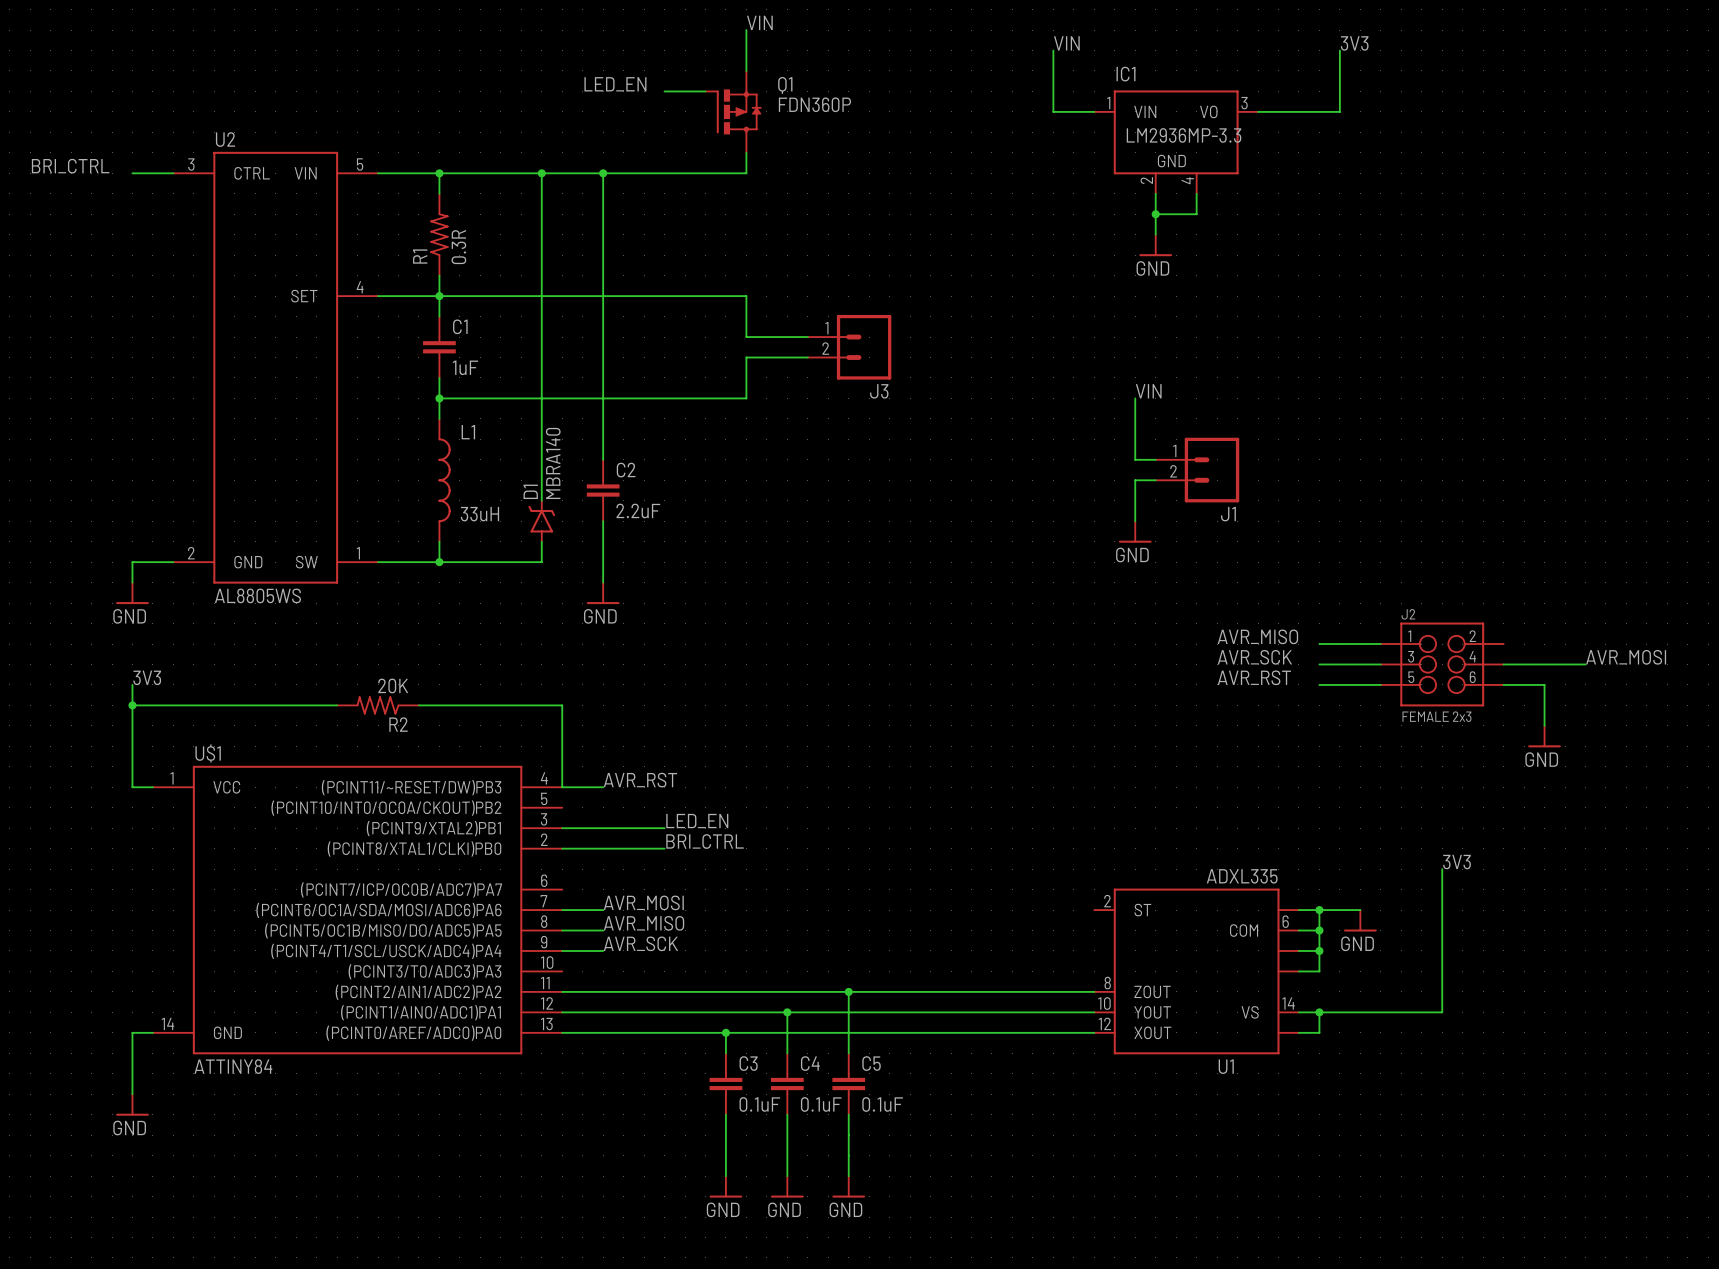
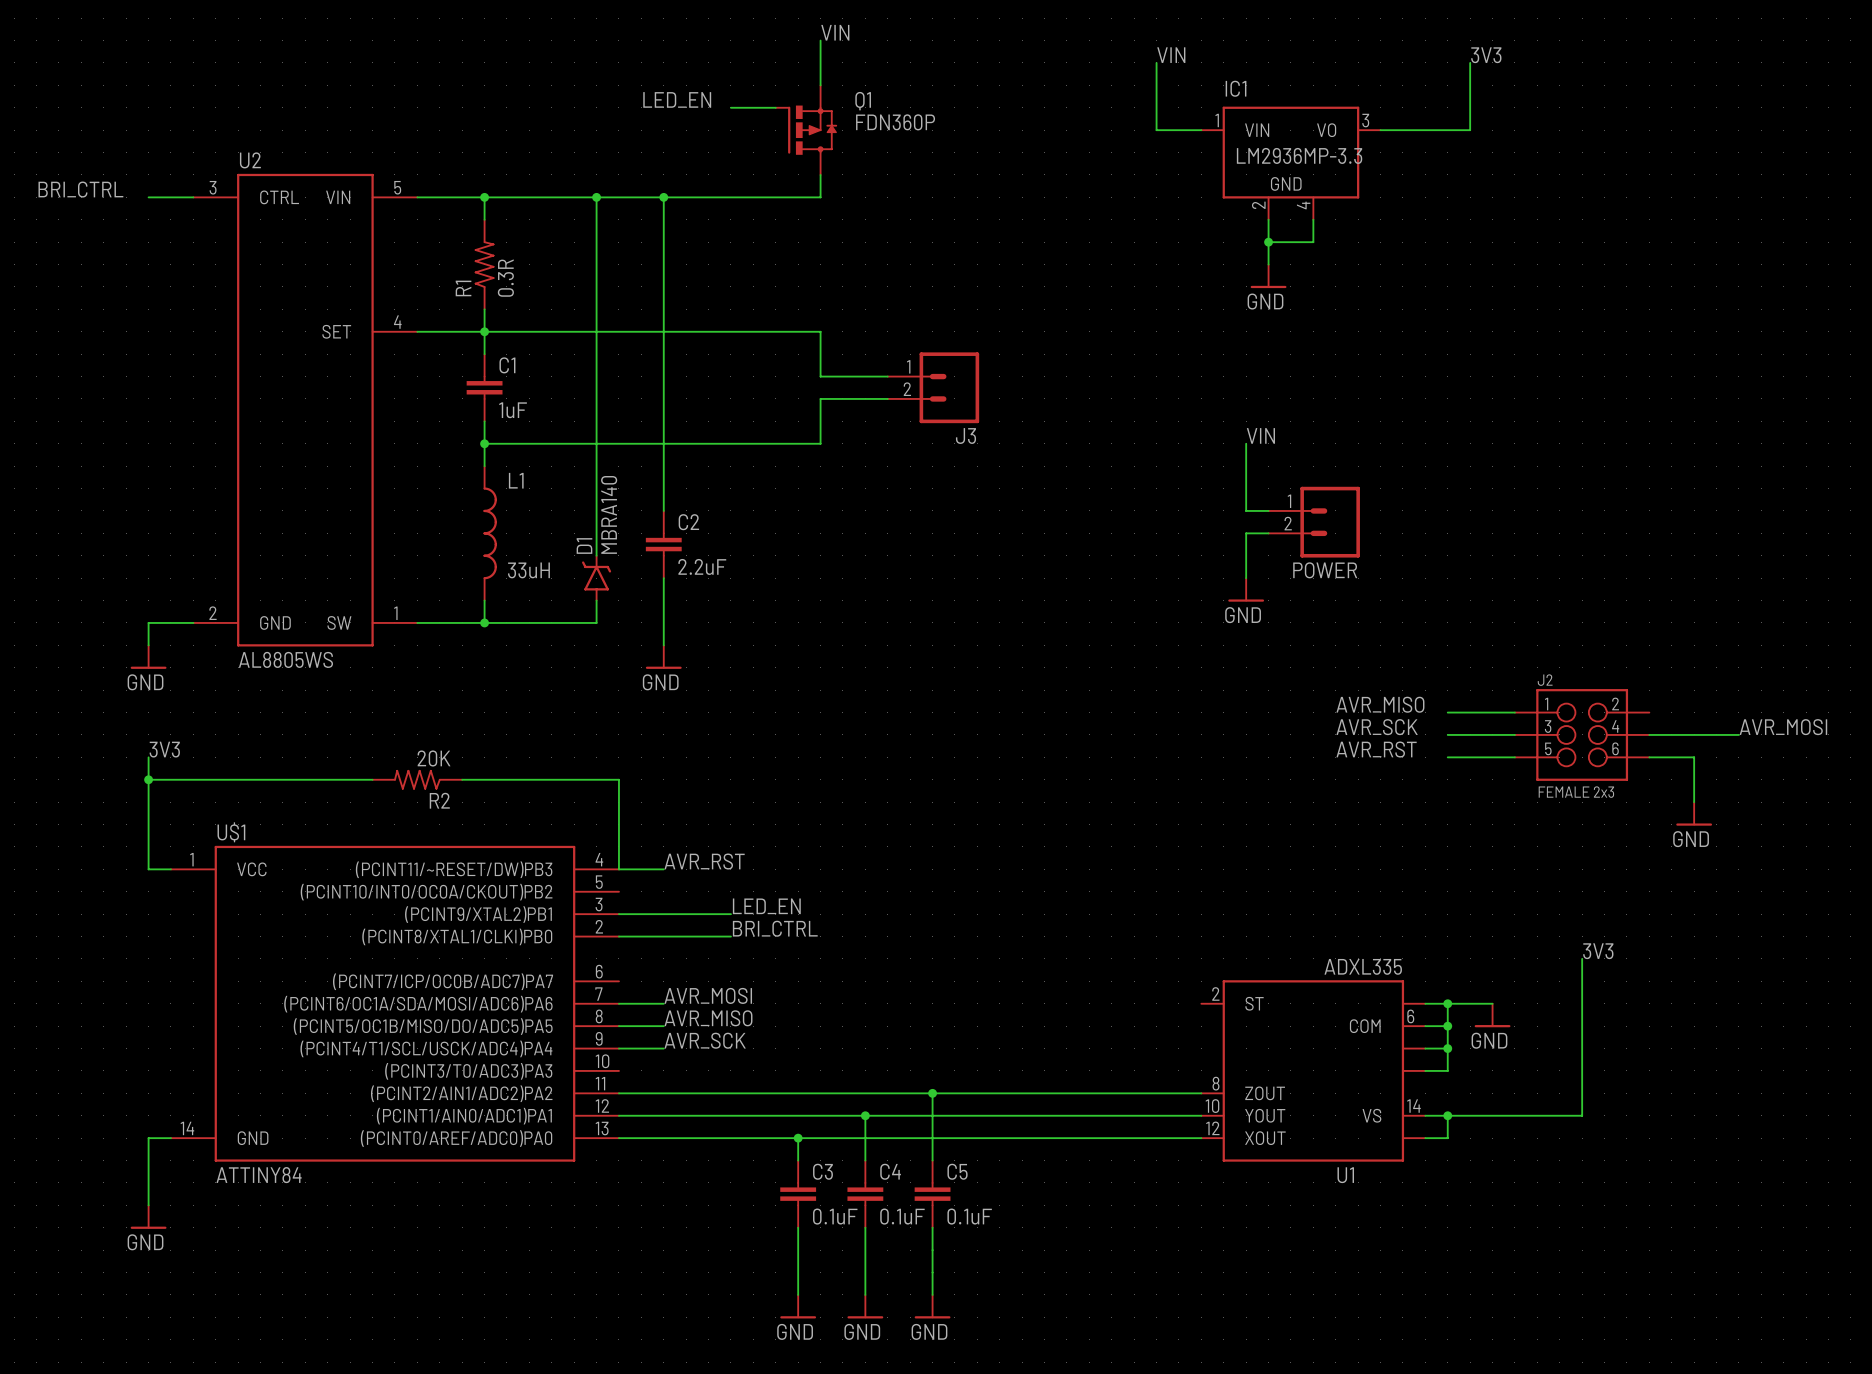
J1 name: J1 (1228, 514) -> POWER (1325, 570)

